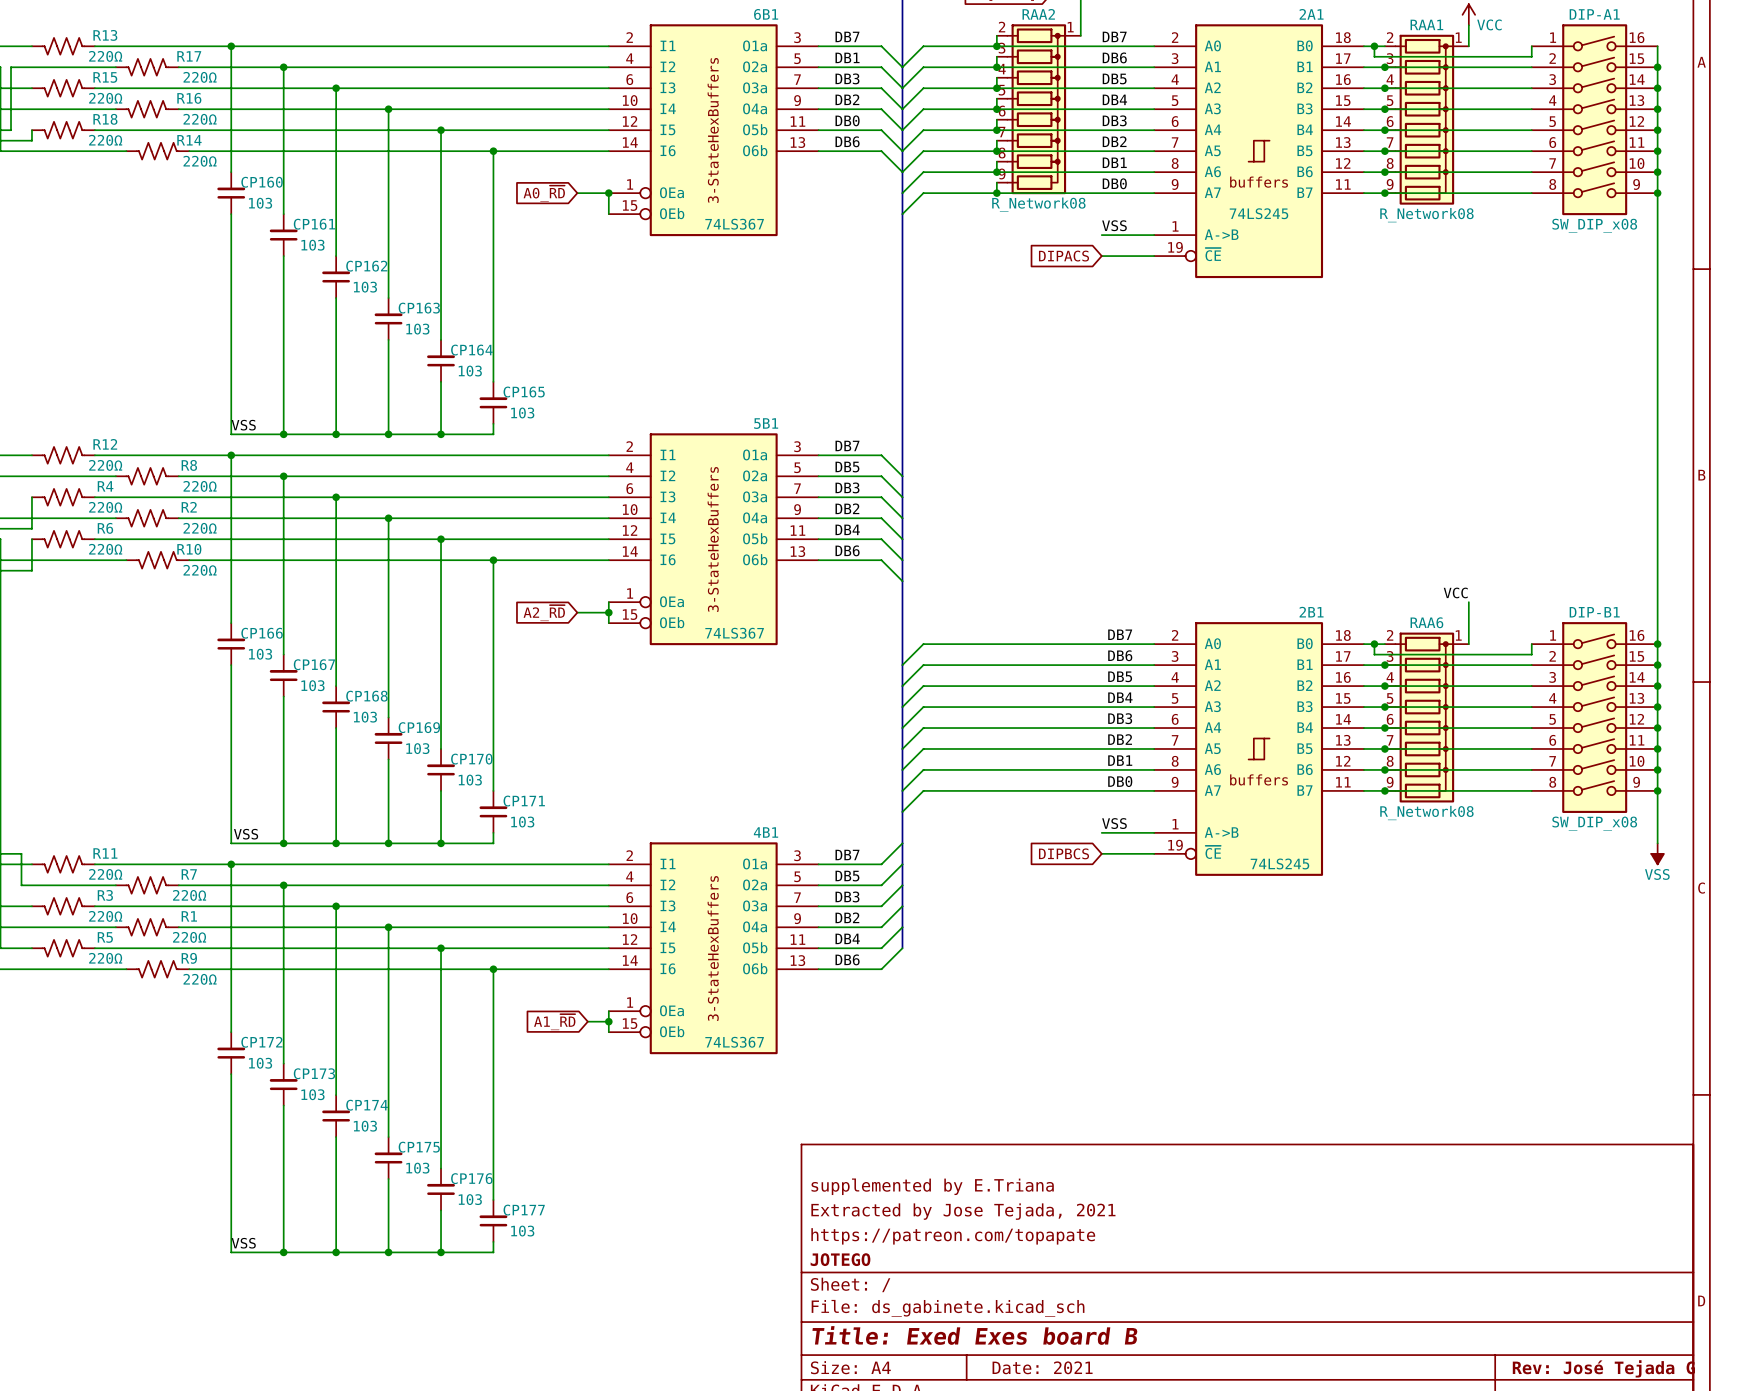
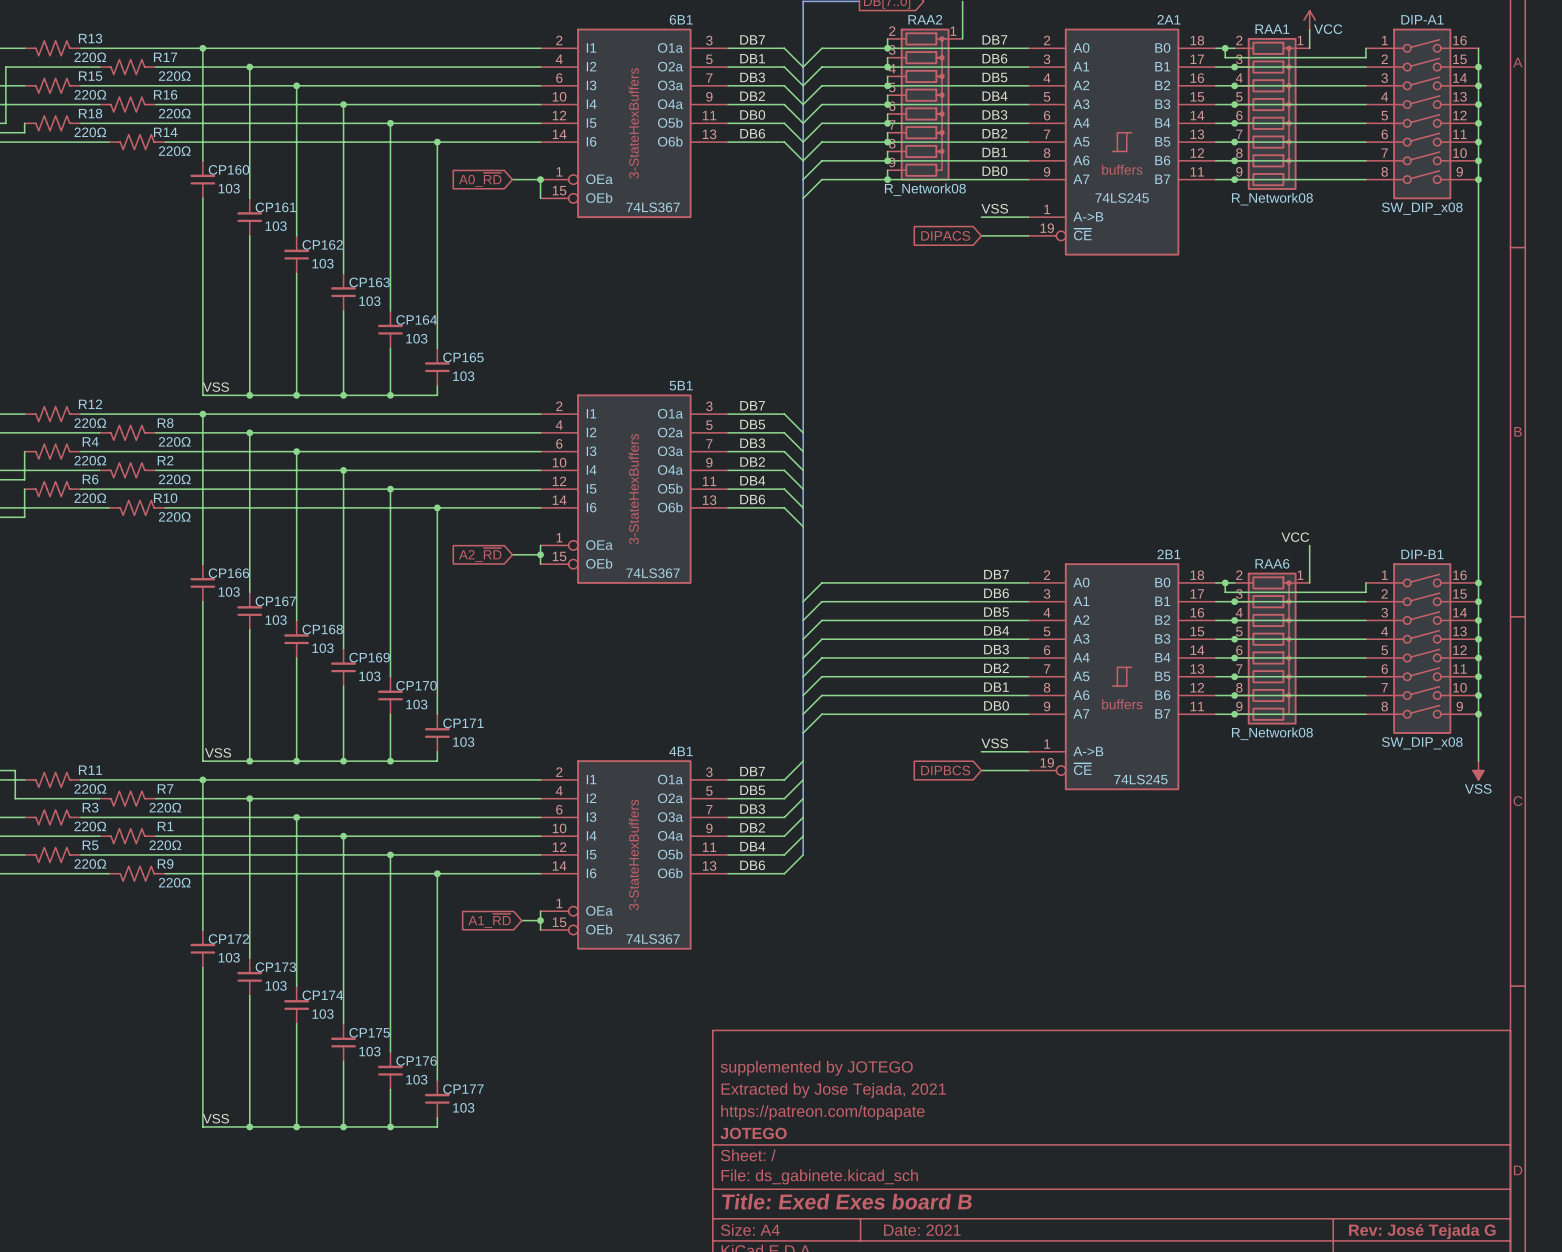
title block: supplemented by E.Triana (932, 1186) -> supplemented by JOTEGO (816, 1068)

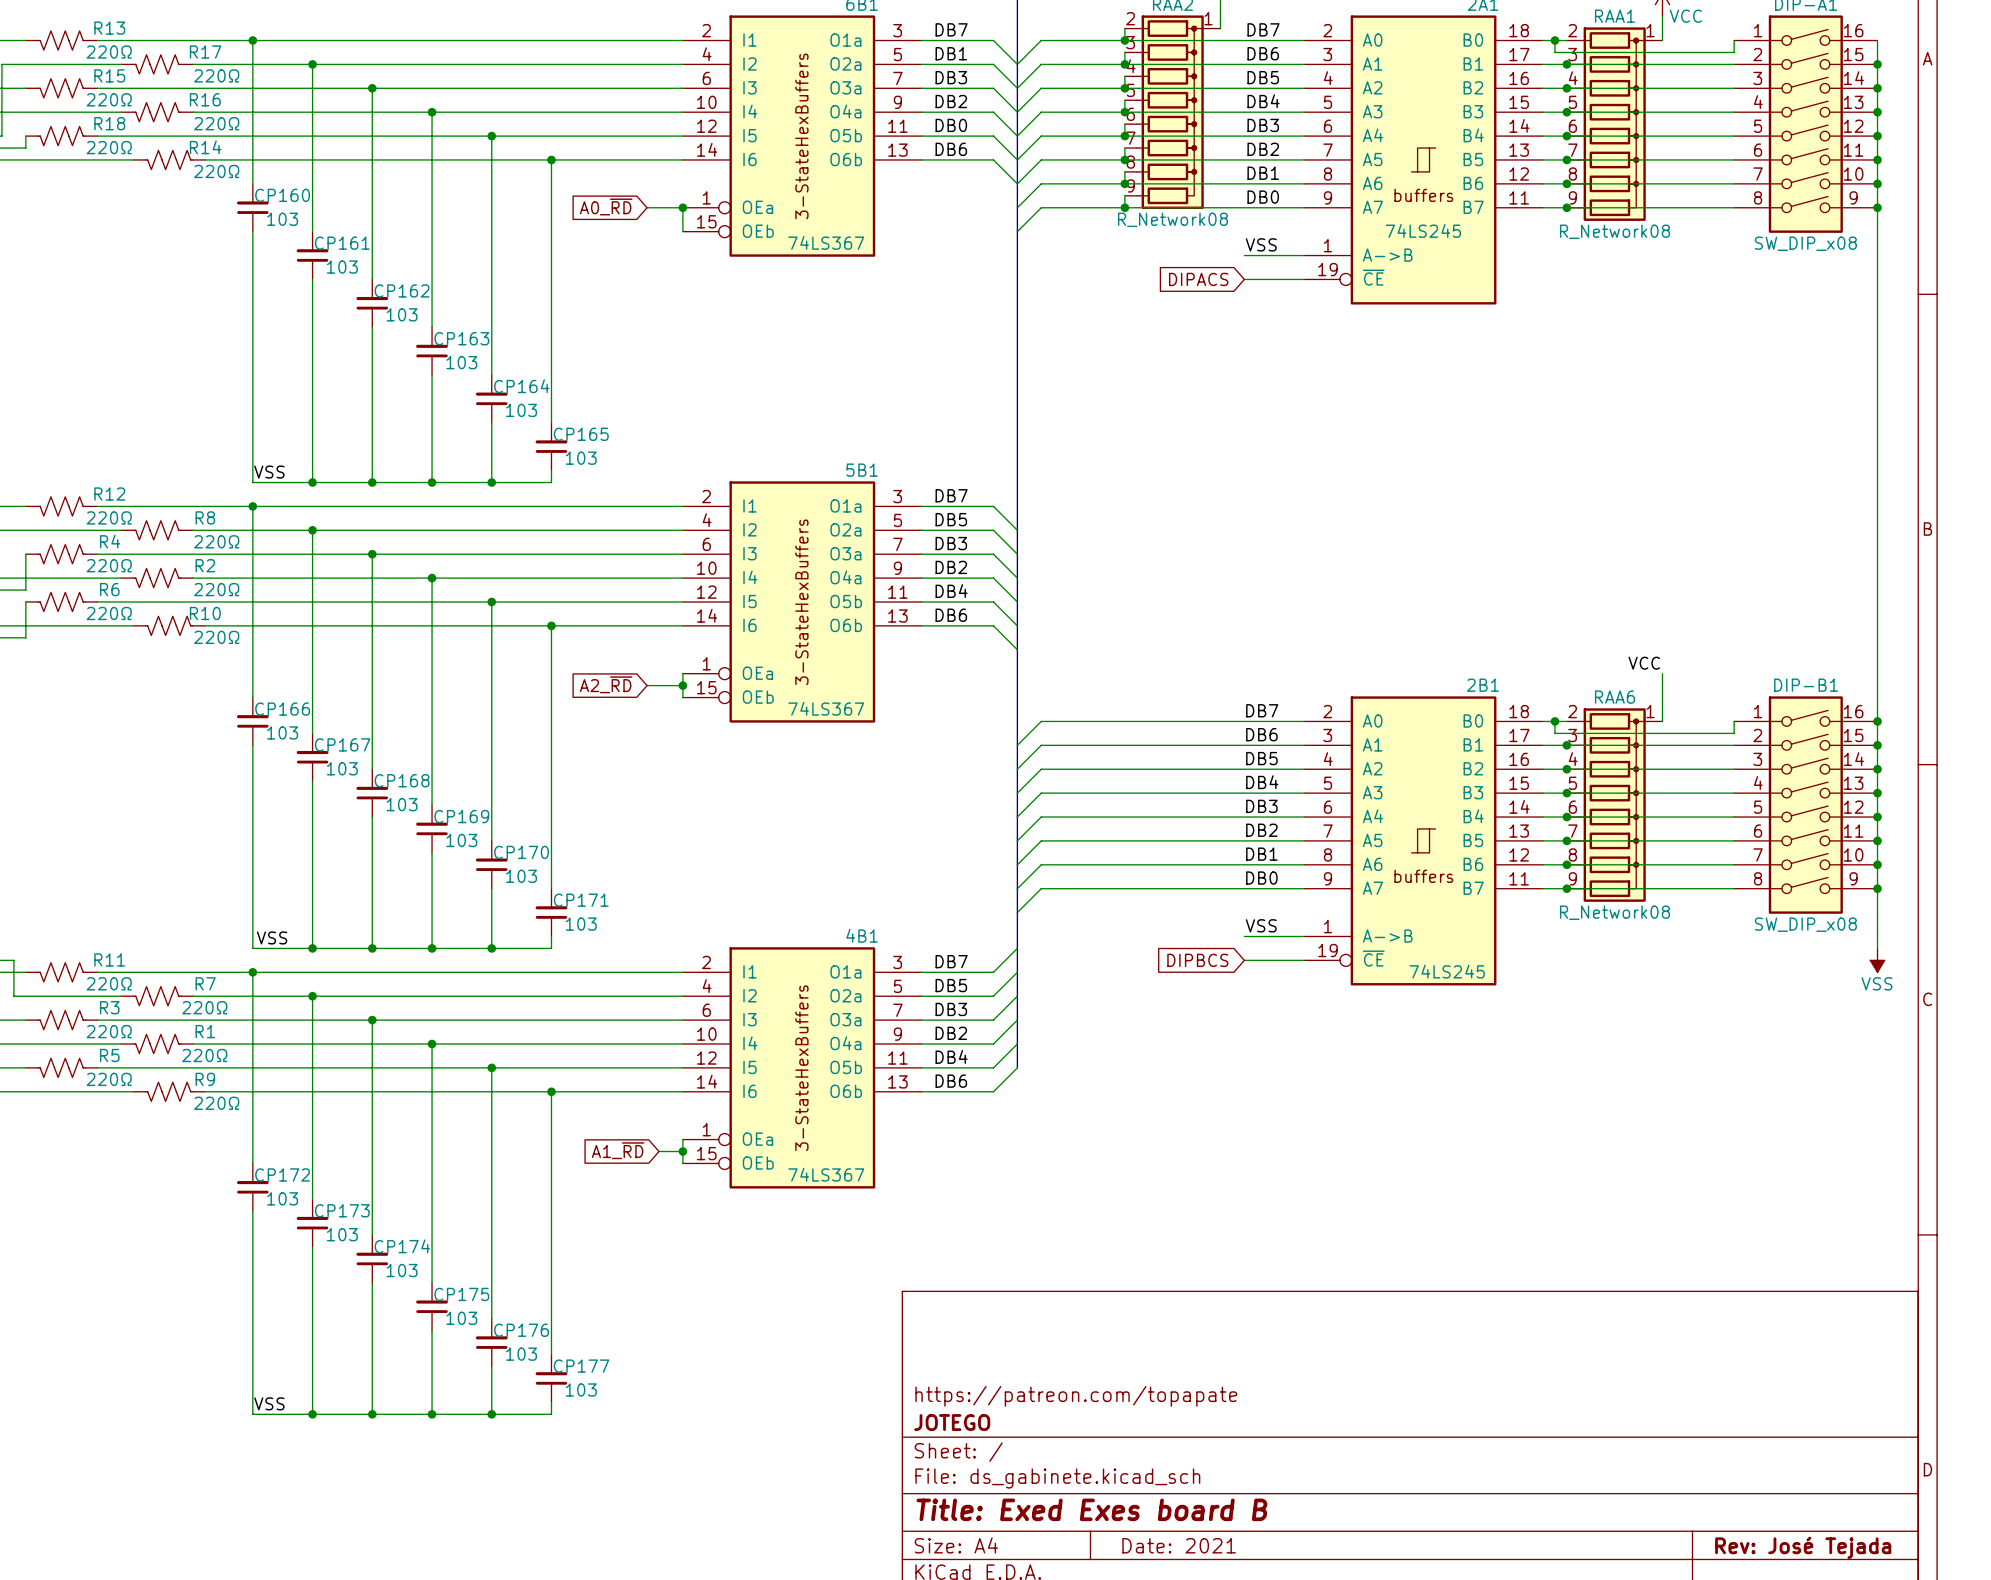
title block: supplemented by JOTEGO (816, 1068) -> none
title block: Extracted by Jose Tejada, 2021 (833, 1090) -> none
title block: Rev: José Tejada G (1422, 1231) -> Rev: José Tejada (1803, 1547)

